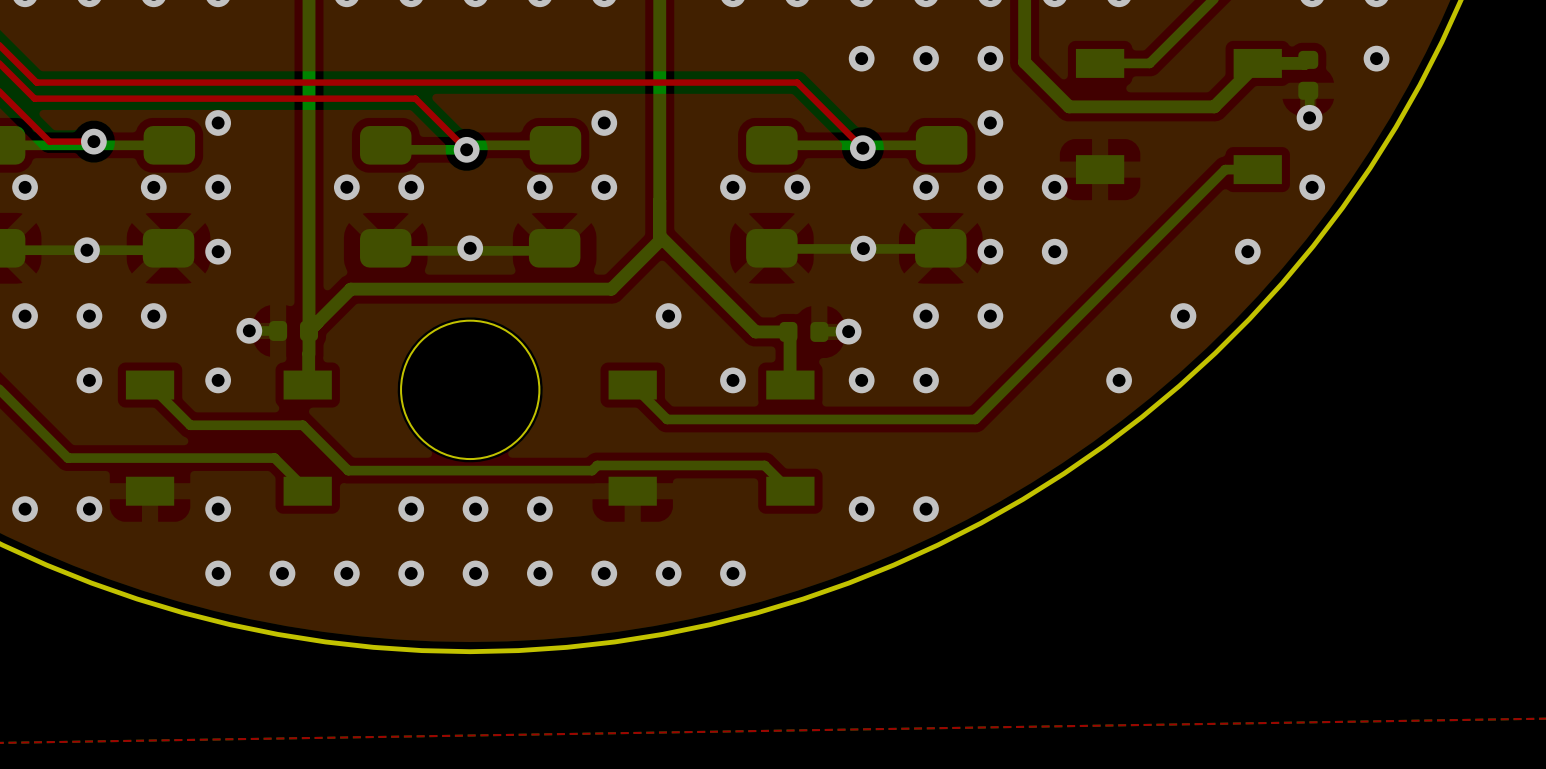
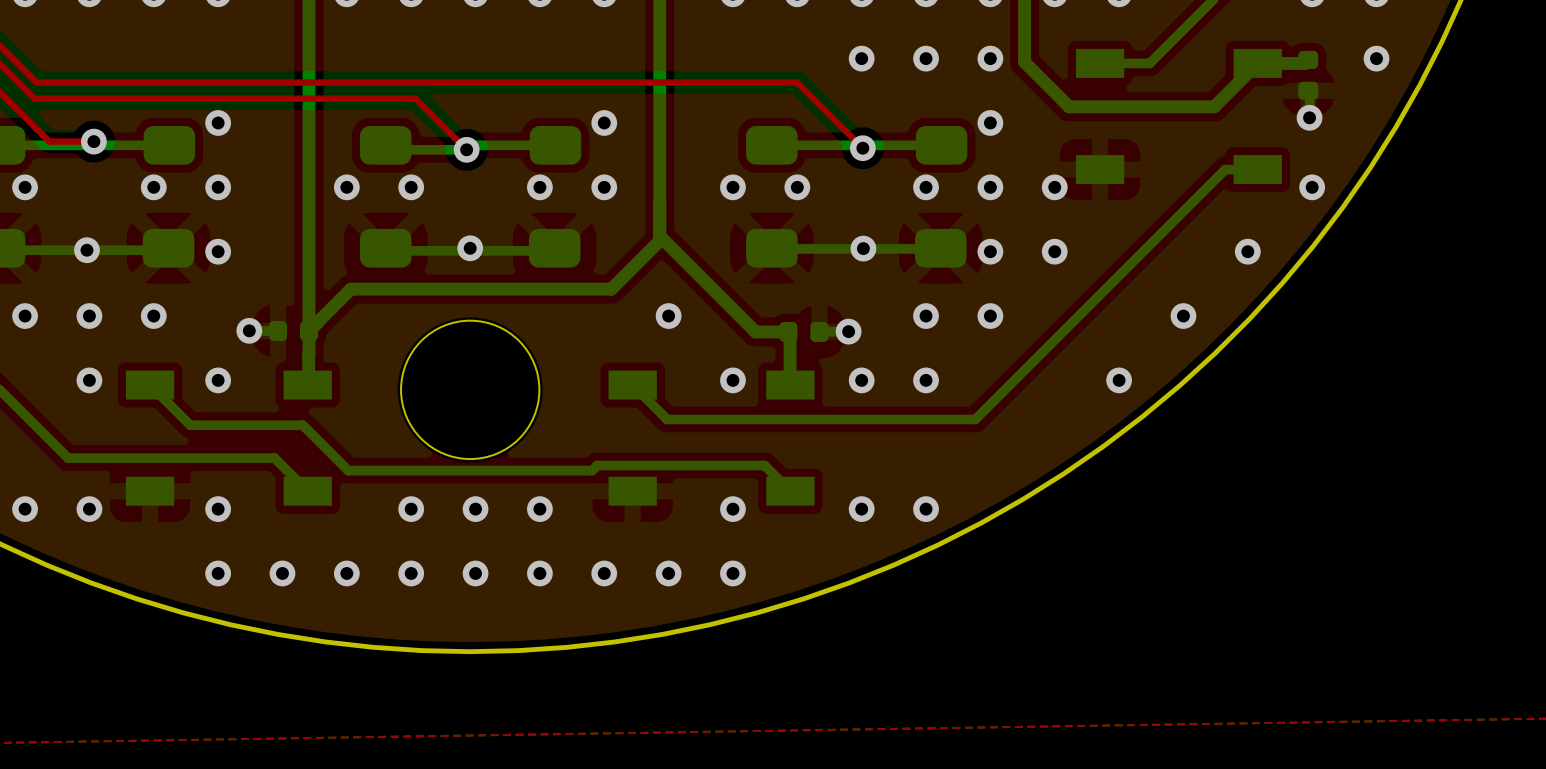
via: none -> (732, 509)

